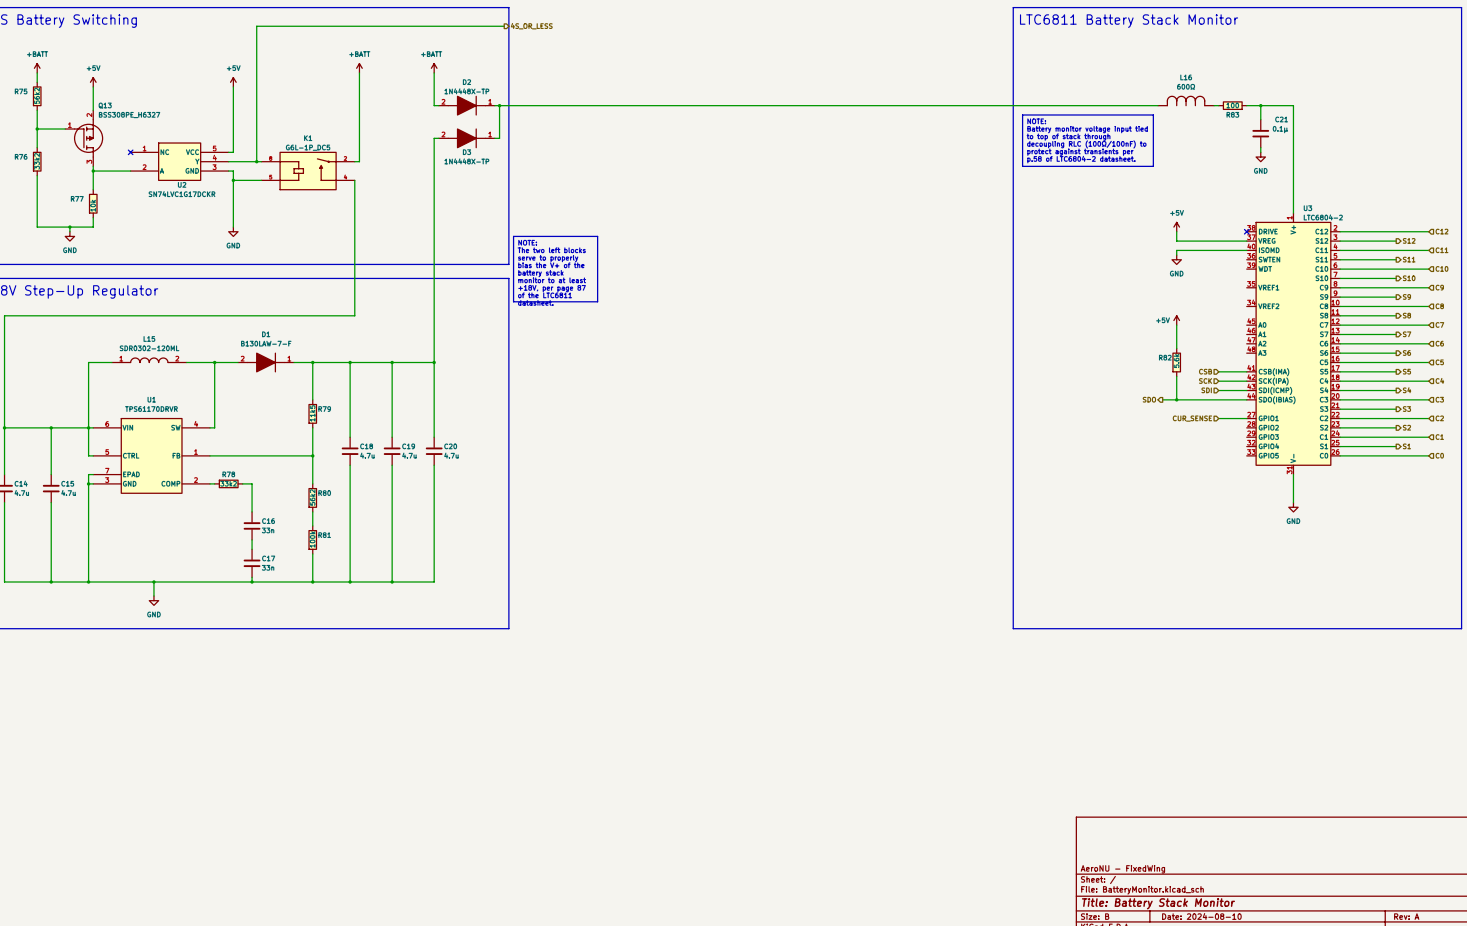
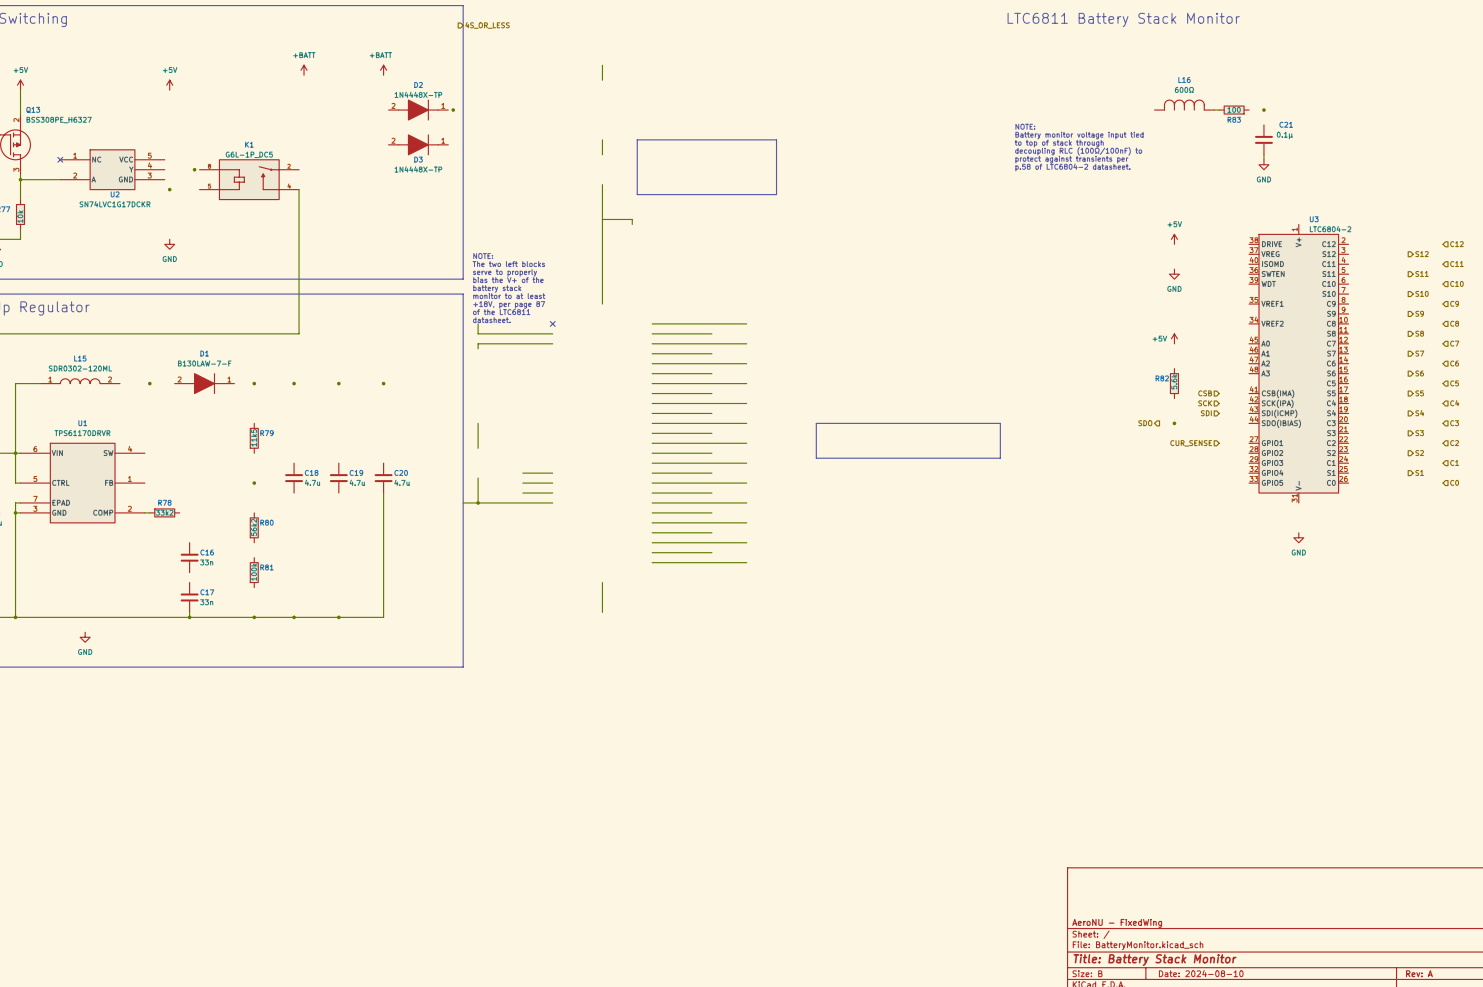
wire: (504, 26) (256, 26) (256, 161) -> none
wire: none -> (602, 65) (602, 80)
wire: (359, 72) (359, 161) (354, 161) -> none
wire: (434, 72) (434, 105) (438, 105) -> none
wire: (233, 86) (233, 152) (228, 152) -> none
wire: (494, 105) (1158, 105) -> none
wire: (499, 105) (499, 138) (494, 138) -> none
wire: (1246, 105) (1293, 105) (1293, 213) -> none
wire: (1260, 105) (1260, 119) -> none
line: (1022, 114) (1153, 114) (1153, 166) (1022, 166) (1022, 114) -> none
wire: none -> (602, 139) (602, 154)
line: none -> (637, 139) (776, 139) (776, 194) (637, 194) (637, 139)
wire: (438, 138) (434, 138) (434, 437) -> none
wire: (228, 161) (261, 161) -> none
wire: (228, 171) (233, 171) (233, 227) -> none
wire: none -> (602, 184) (602, 304)
wire: (233, 180) (261, 180) -> none
wire: none -> (602, 219) (632, 219) (632, 224)
wire: (1176, 231) (1176, 241) (1246, 241) -> none
no-connect mark: (1246, 231) -> none
wire: (1340, 231) (1428, 231) -> none
line: (513, 236) (597, 236) (597, 301) (513, 301) (513, 236) -> none
wire: (1340, 241) (1396, 241) -> none
wire: (1246, 250) (1176, 250) (1176, 255) -> none
wire: (1340, 250) (1428, 250) -> none
wire: (1340, 259) (1396, 259) -> none
wire: (1340, 269) (1428, 269) -> none
wire: (1340, 278) (1396, 278) -> none
wire: (1340, 287) (1428, 287) -> none
wire: (1340, 297) (1396, 297) -> none
wire: none -> (478, 323) (478, 333) (552, 333)
no-connect mark: none -> (552, 323)
wire: none -> (652, 323) (746, 323)
wire: (1340, 306) (1428, 306) -> none
wire: none -> (652, 333) (711, 333)
wire: (1340, 315) (1396, 315) -> none
wire: none -> (552, 343) (478, 343) (478, 348)
wire: none -> (652, 343) (746, 343)
wire: (1176, 325) (1176, 348) -> none
wire: (1340, 325) (1428, 325) -> none
wire: none -> (652, 353) (711, 353)
wire: (1340, 334) (1396, 334) -> none
wire: none -> (652, 363) (746, 363)
wire: (1340, 343) (1428, 343) -> none
wire: none -> (652, 373) (711, 373)
wire: (1340, 353) (1396, 353) -> none
wire: (186, 362) (238, 362) -> none
wire: (214, 362) (214, 427) (210, 427) -> none
wire: (294, 362) (434, 362) -> none
wire: (312, 362) (312, 399) -> none
wire: (350, 362) (350, 437) -> none
wire: (392, 362) (392, 437) -> none
wire: none -> (652, 383) (746, 383)
wire: (1340, 362) (1428, 362) -> none
wire: none -> (652, 393) (711, 393)
wire: (1218, 371) (1246, 371) -> none
wire: (1340, 371) (1396, 371) -> none
wire: (1176, 376) (1176, 399) -> none
wire: none -> (652, 403) (746, 403)
wire: (1218, 381) (1246, 381) -> none
wire: (1340, 381) (1428, 381) -> none
wire: none -> (652, 413) (711, 413)
wire: (1218, 390) (1246, 390) -> none
wire: (1340, 390) (1396, 390) -> none
wire: none -> (478, 423) (478, 448)
wire: none -> (652, 423) (746, 423)
line: (1013, 399) (1013, 7) (1461, 7) (1461, 628) (1013, 628) (1013, 432) -> (1000, 423) (816, 423) (816, 458) (1000, 458)
wire: (1162, 399) (1246, 399) -> none
wire: (1340, 399) (1428, 399) -> none
wire: none -> (652, 433) (711, 433)
wire: (1340, 409) (1396, 409) -> none
wire: none -> (652, 443) (746, 443)
wire: (1218, 418) (1246, 418) -> none
wire: (1340, 418) (1428, 418) -> none
wire: (312, 427) (312, 483) -> none
wire: none -> (652, 453) (711, 453)
wire: (1340, 427) (1396, 427) -> none
wire: none -> (652, 463) (746, 463)
wire: (1340, 437) (1428, 437) -> none
wire: none -> (522, 473) (552, 473)
wire: none -> (652, 473) (711, 473)
wire: (1340, 446) (1396, 446) -> none
wire: none -> (478, 478) (478, 502)
wire: (210, 455) (312, 455) -> none
wire: none -> (522, 483) (552, 483)
wire: none -> (652, 483) (746, 483)
wire: (1340, 455) (1428, 455) -> none
wire: (350, 465) (350, 581) -> none
wire: (392, 465) (392, 581) -> none
wire: none -> (522, 493) (552, 493)
wire: none -> (652, 493) (711, 493)
wire: none -> (463, 502) (552, 502)
junction: none -> (478, 502)
wire: none -> (652, 502) (746, 502)
wire: (1293, 474) (1293, 502) -> none
wire: (242, 483) (252, 483) (252, 511) -> none
wire: none -> (652, 512) (711, 512)
wire: none -> (652, 522) (746, 522)
wire: none -> (652, 532) (711, 532)
wire: (312, 511) (312, 525) -> none
wire: none -> (652, 542) (746, 542)
wire: none -> (652, 552) (711, 552)
wire: none -> (652, 562) (746, 562)
wire: (252, 539) (252, 549) -> none
wire: none -> (602, 582) (602, 612)
wire: (312, 553) (312, 581) -> none
wire: (153, 581) (153, 596) -> none
junction: (153, 581) -> none

